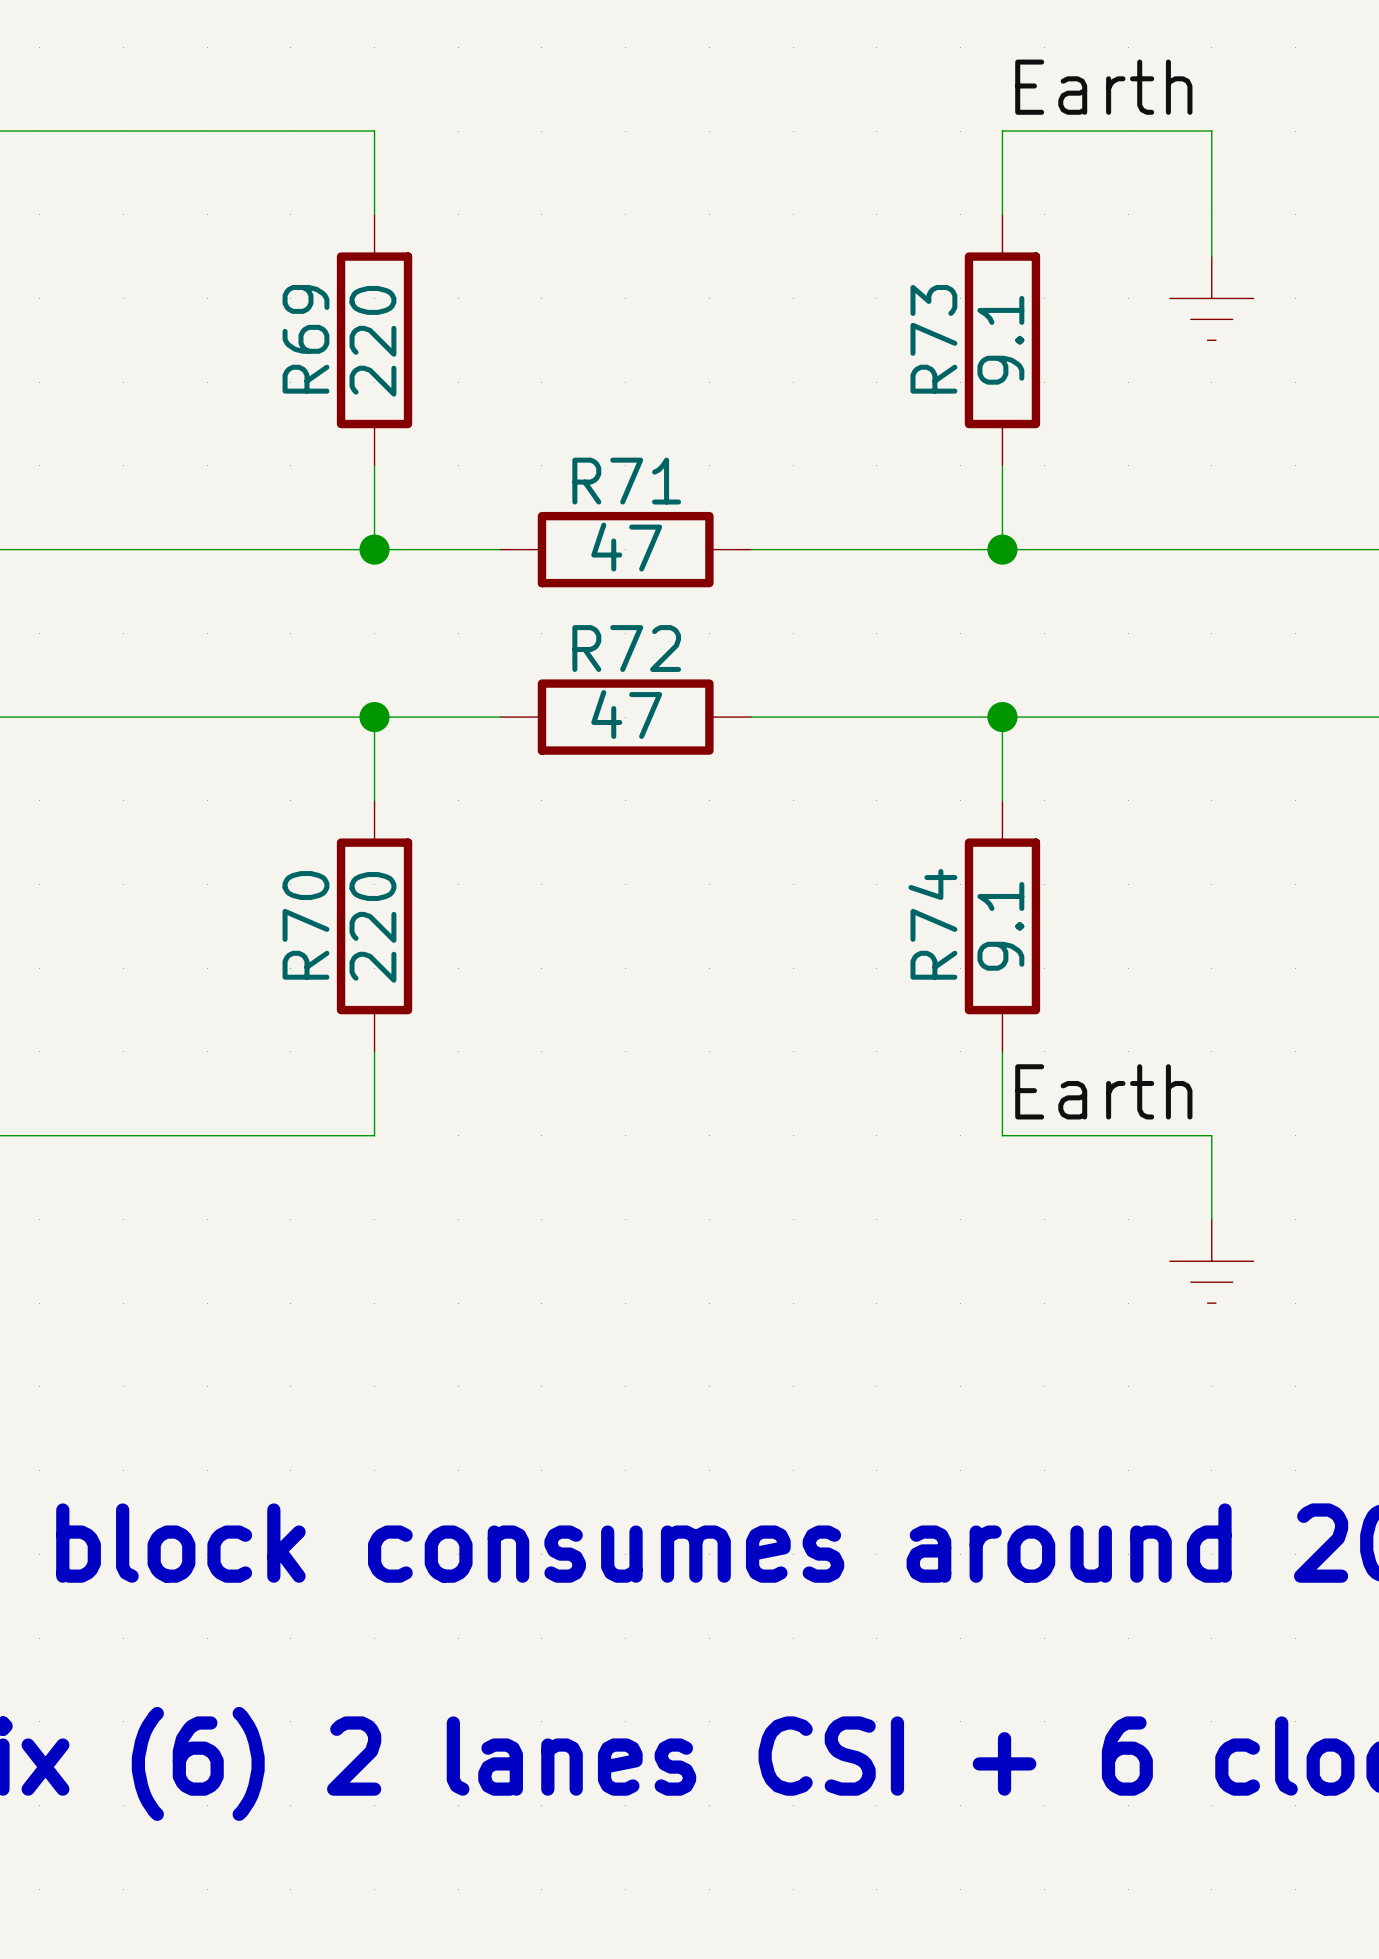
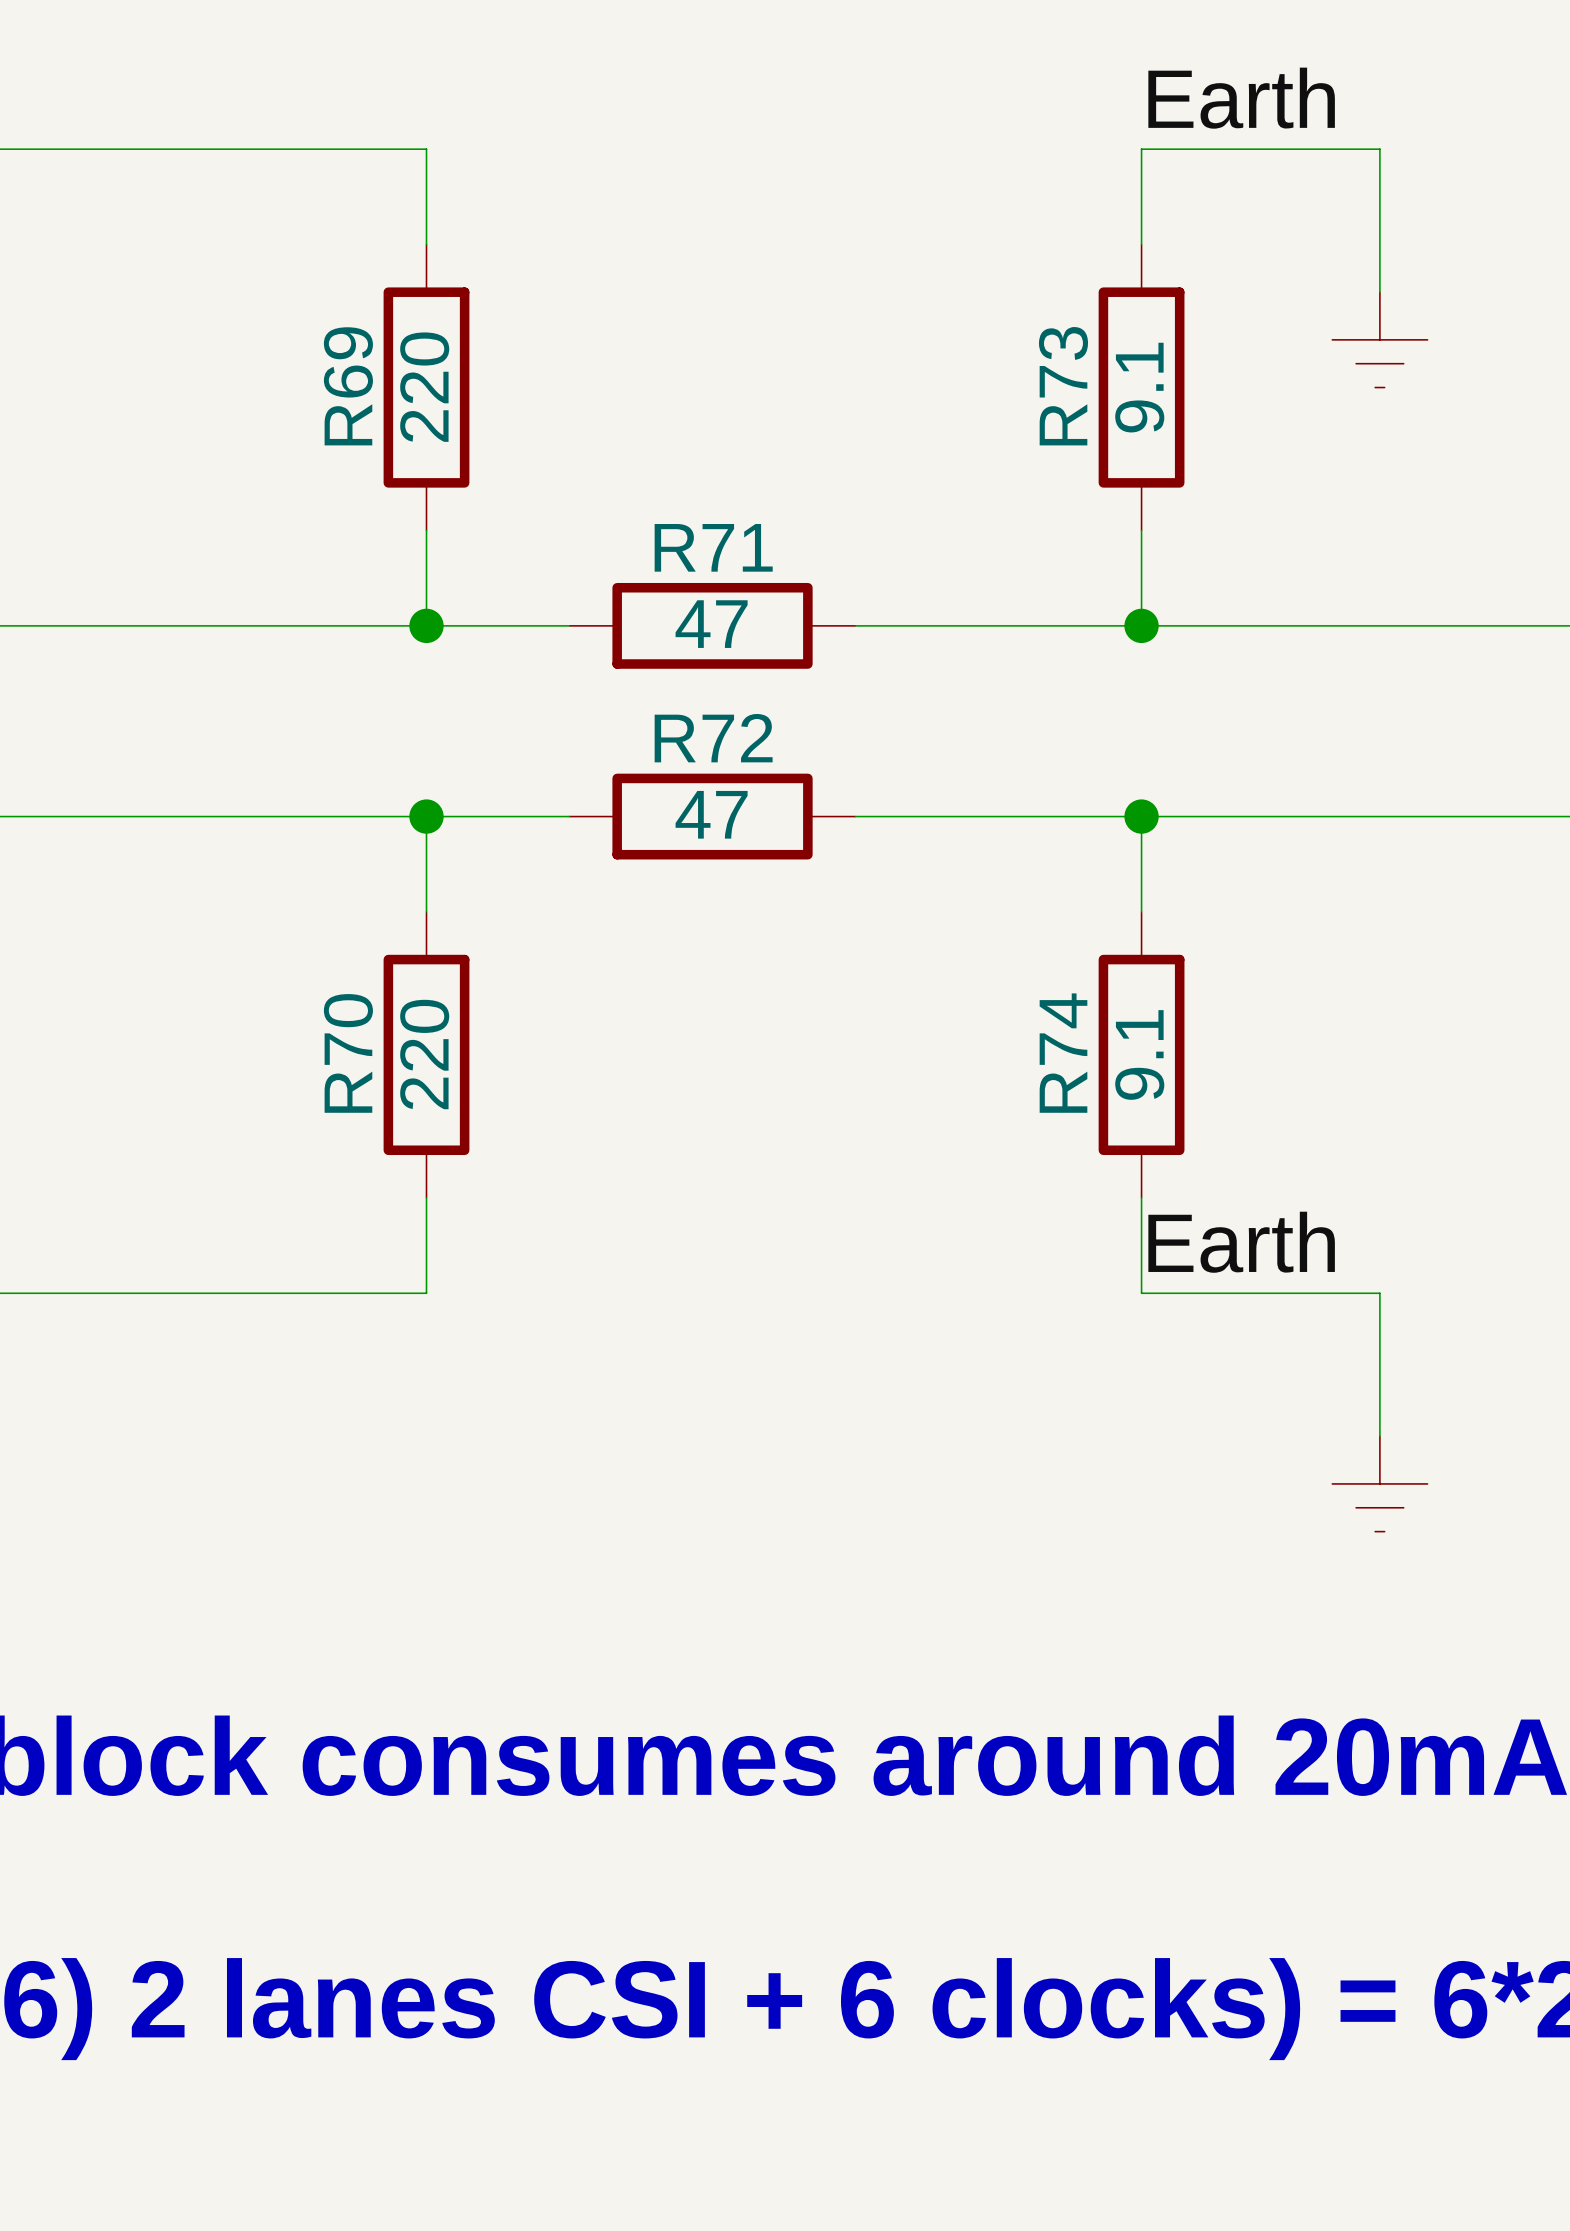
power symbol position: (1211, 1261) -> (1379, 1483)

